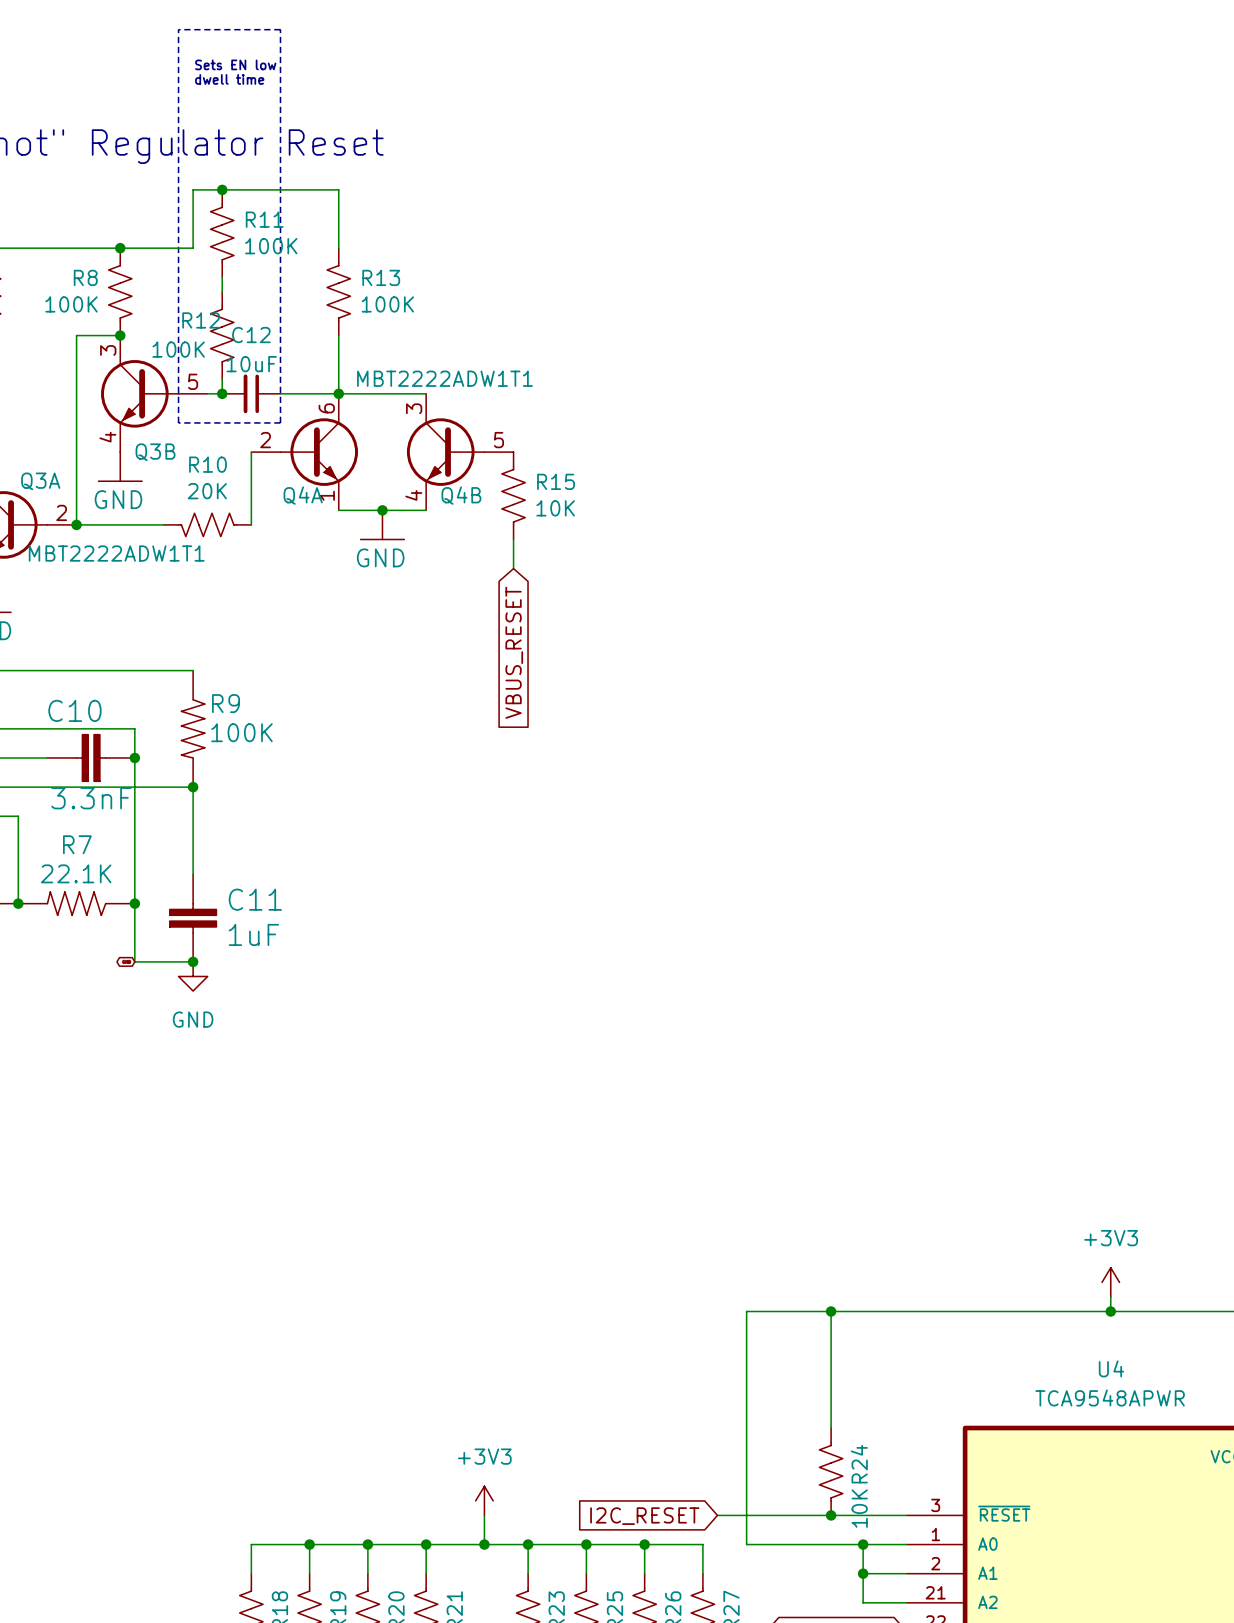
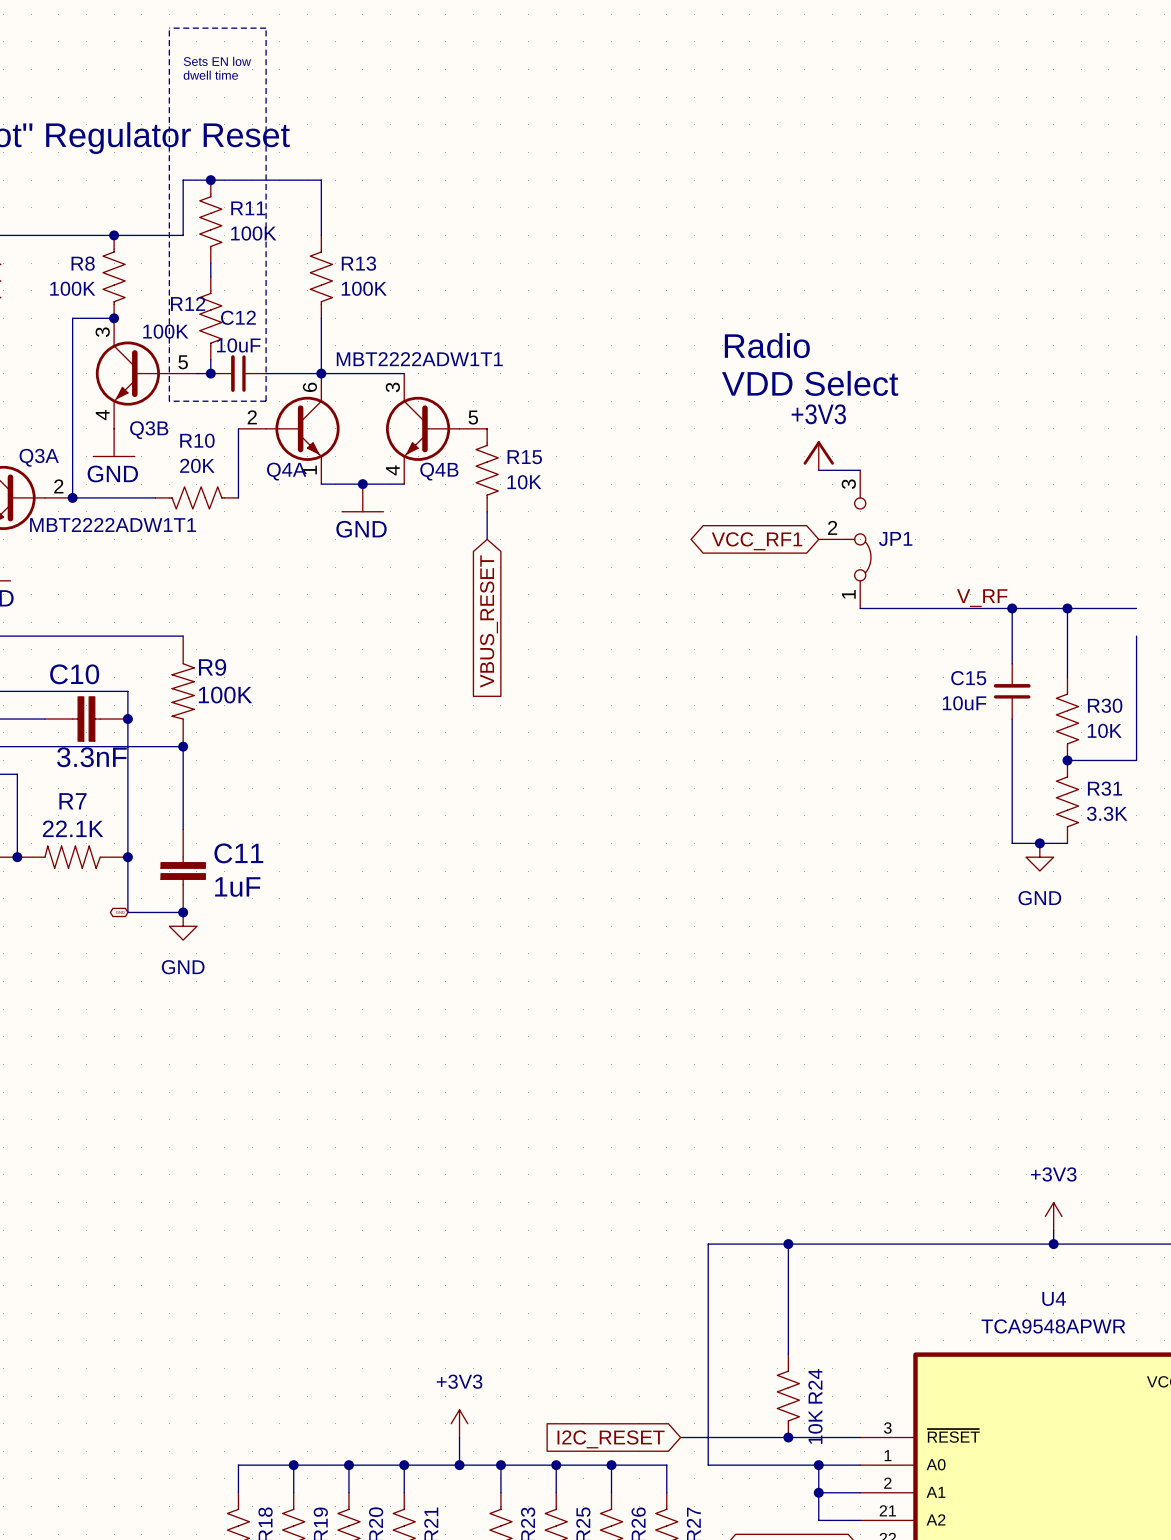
text: none -> Radio (767, 345)
text: none -> VDD Select (810, 383)
power symbol: none -> +3V3 (818, 455)
wire: none -> (818, 470) (860, 470)
JP1: none -> (844, 539)
global label: none -> VCC_RF1 (757, 541)
label: none -> V_RF (982, 598)
wire: none -> (860, 608) (1136, 608)
wire: none -> (1012, 608) (1012, 663)
junction: none -> (1012, 608)
wire: none -> (1067, 608) (1067, 677)
junction: none -> (1067, 608)
wire: none -> (1136, 636) (1136, 760) (1067, 760)
C15: none -> 10uF (1012, 691)
wire: none -> (1012, 719) (1012, 843) (1067, 843)
R30: none -> 10K (1067, 719)
junction: none -> (1067, 760)
R31: none -> 3.3K (1067, 801)
junction: none -> (1039, 843)
power symbol: none -> GND (1039, 857)

